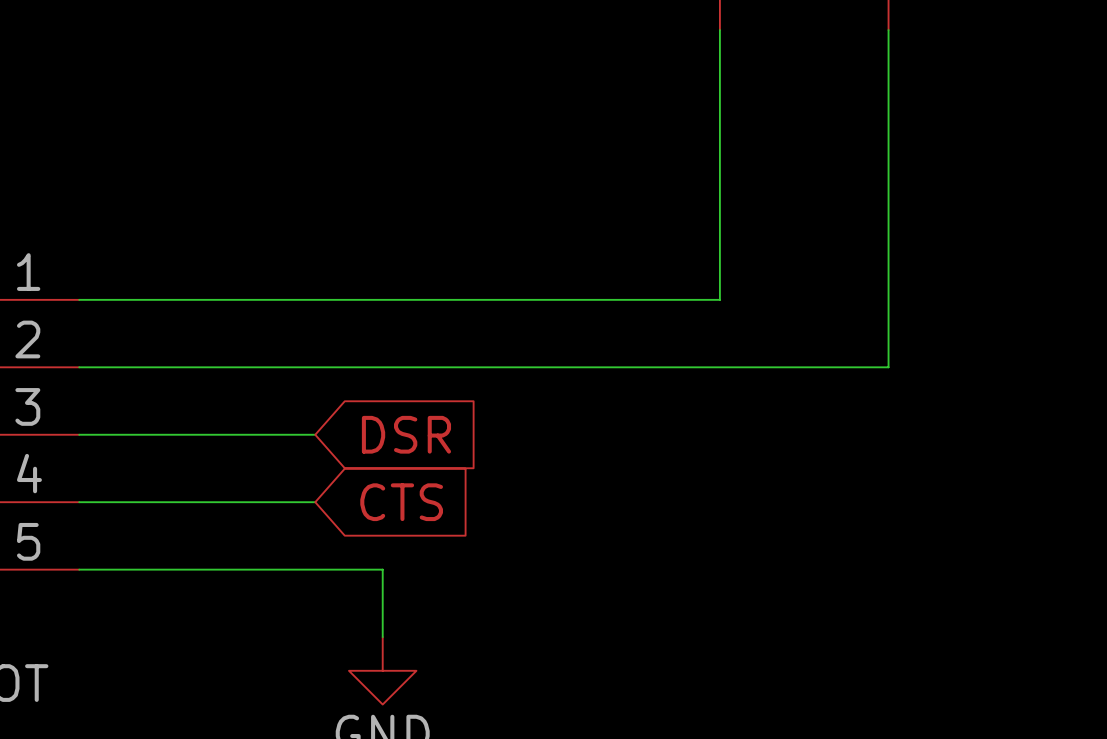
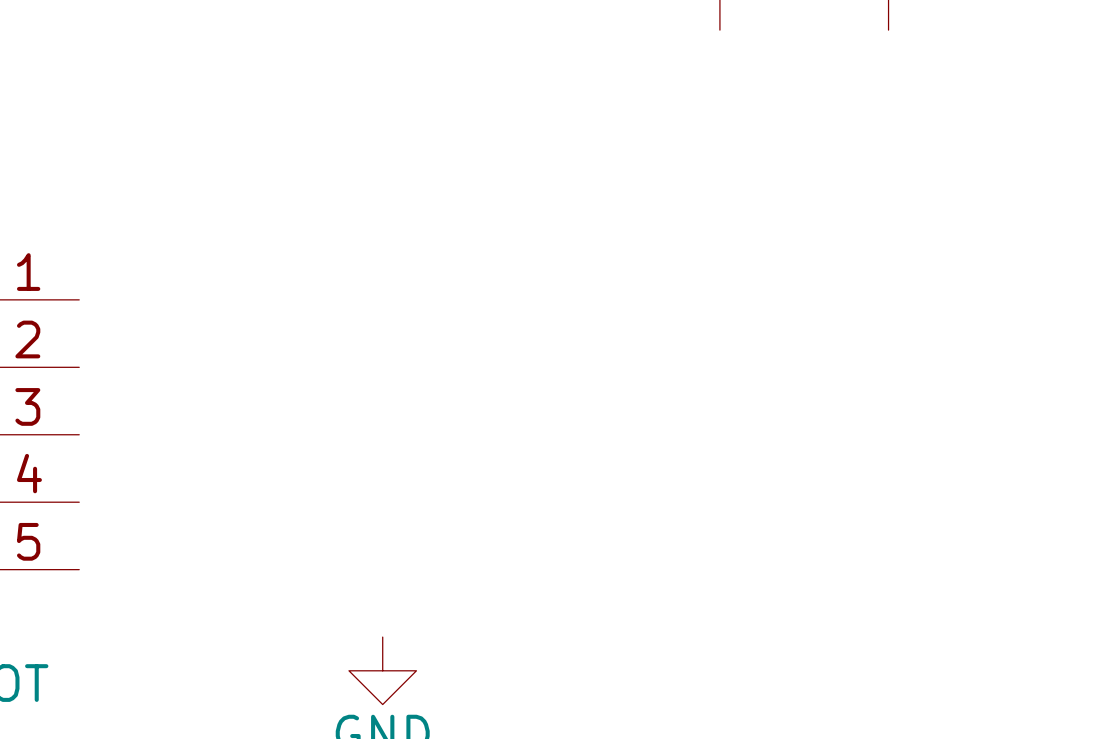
wire: (719, 30) (719, 299) (79, 299) -> none
wire: (888, 30) (888, 367) (79, 367) -> none
wire: (79, 434) (315, 434) -> none
global label: DSR (406, 434) -> none
wire: (79, 502) (315, 502) -> none
global label: CTS (401, 502) -> none
wire: (79, 569) (382, 569) (382, 637) -> none

